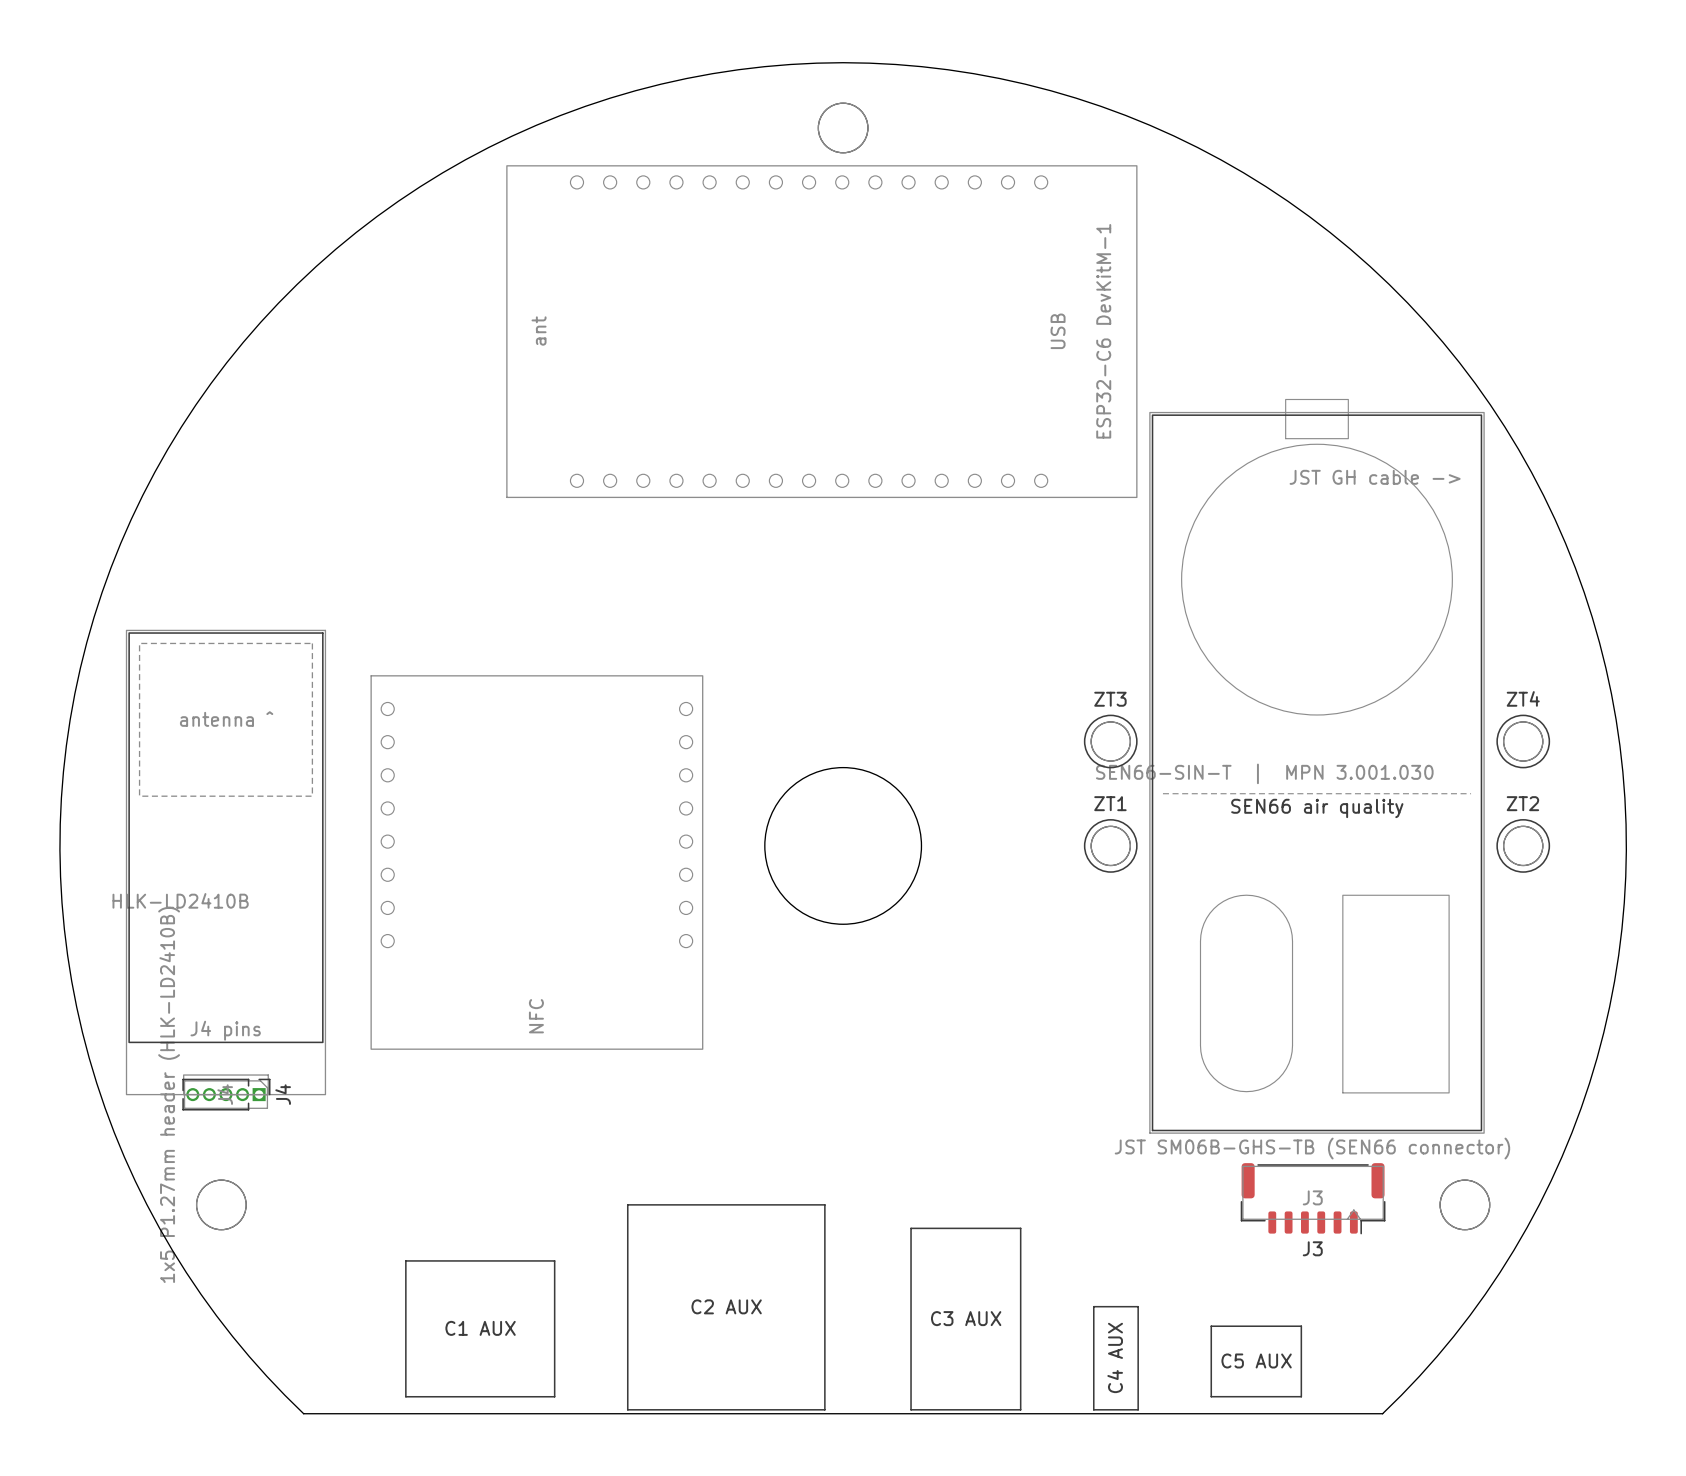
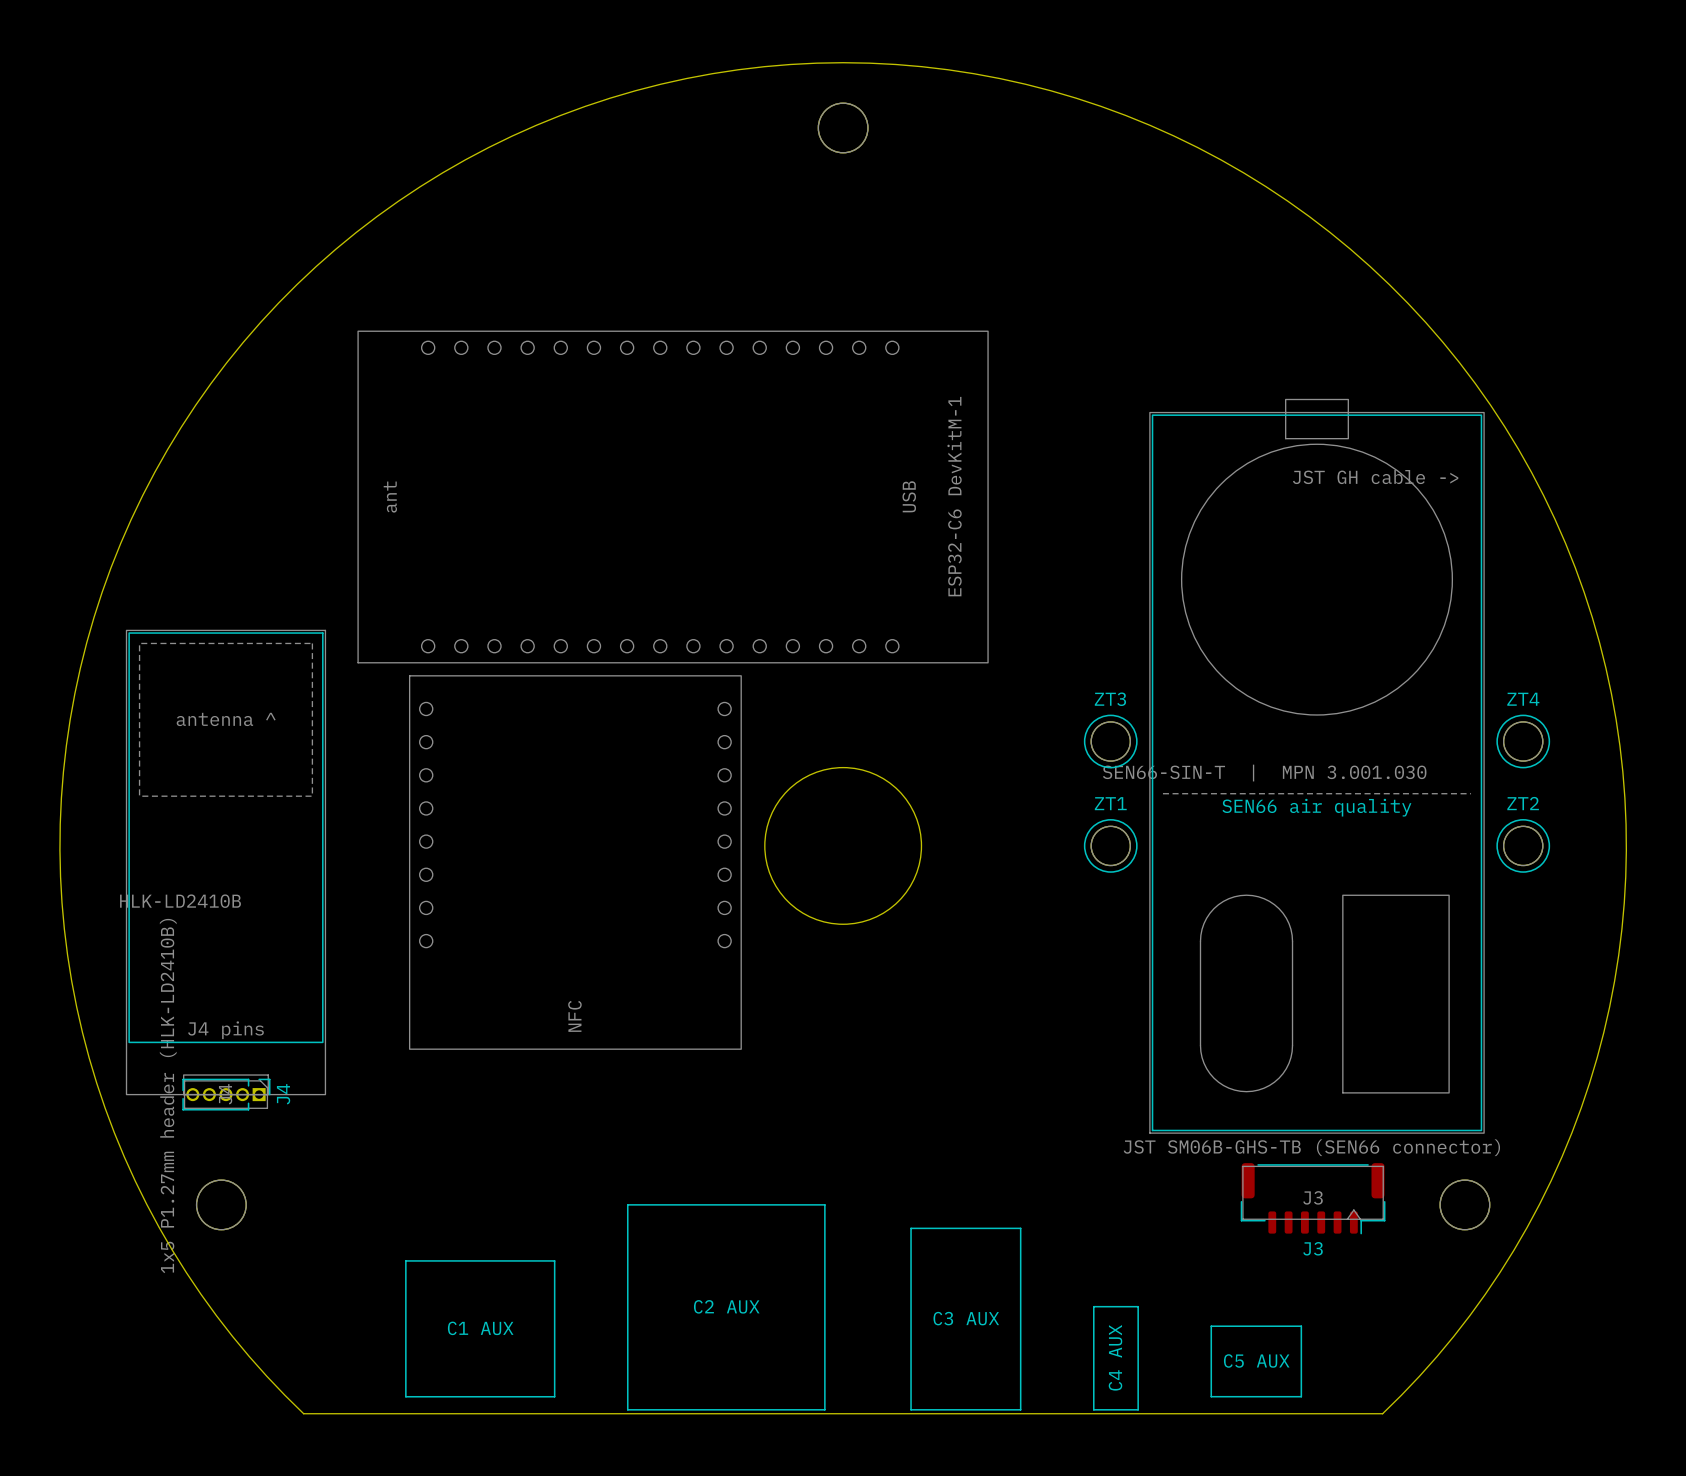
drawing position: (821, 331) -> (673, 497)
drawing position: (536, 862) -> (575, 862)

